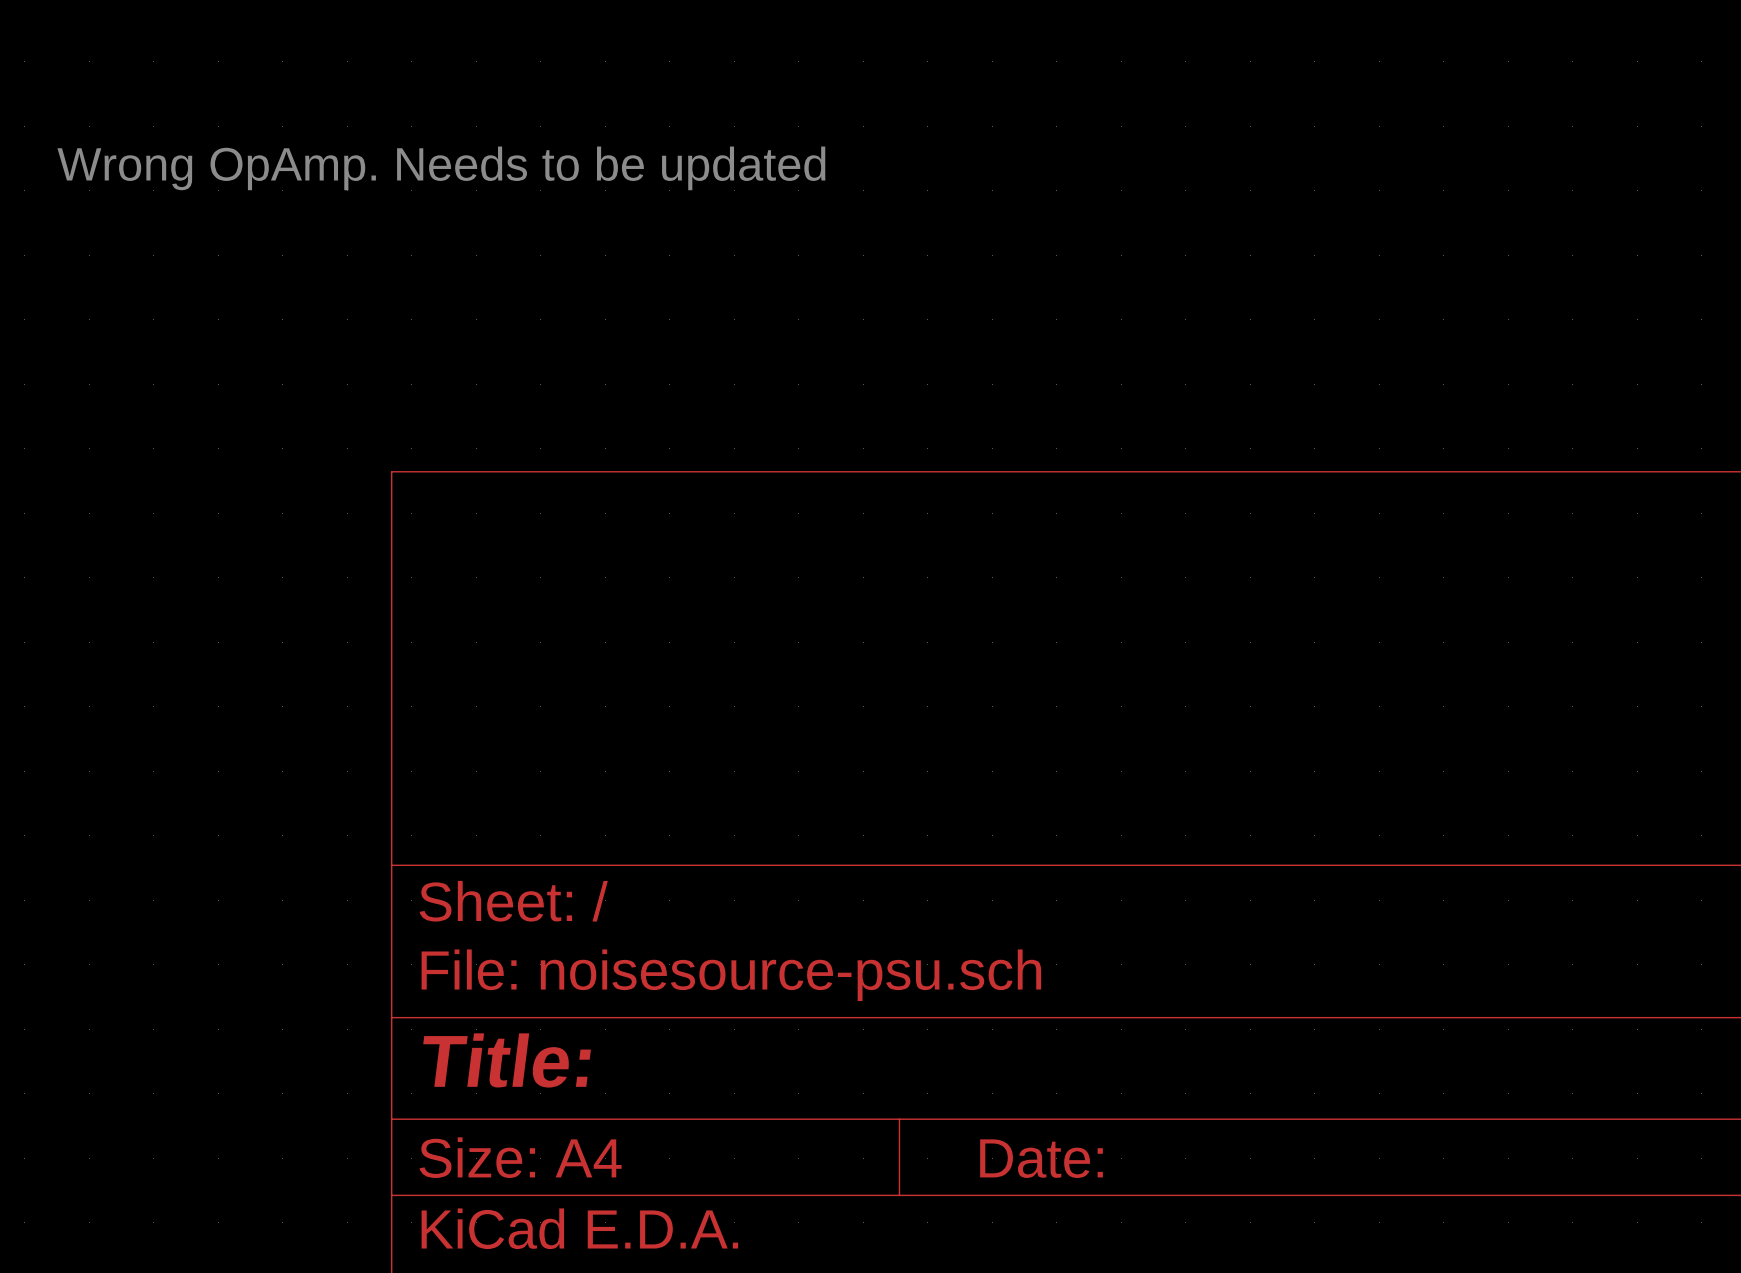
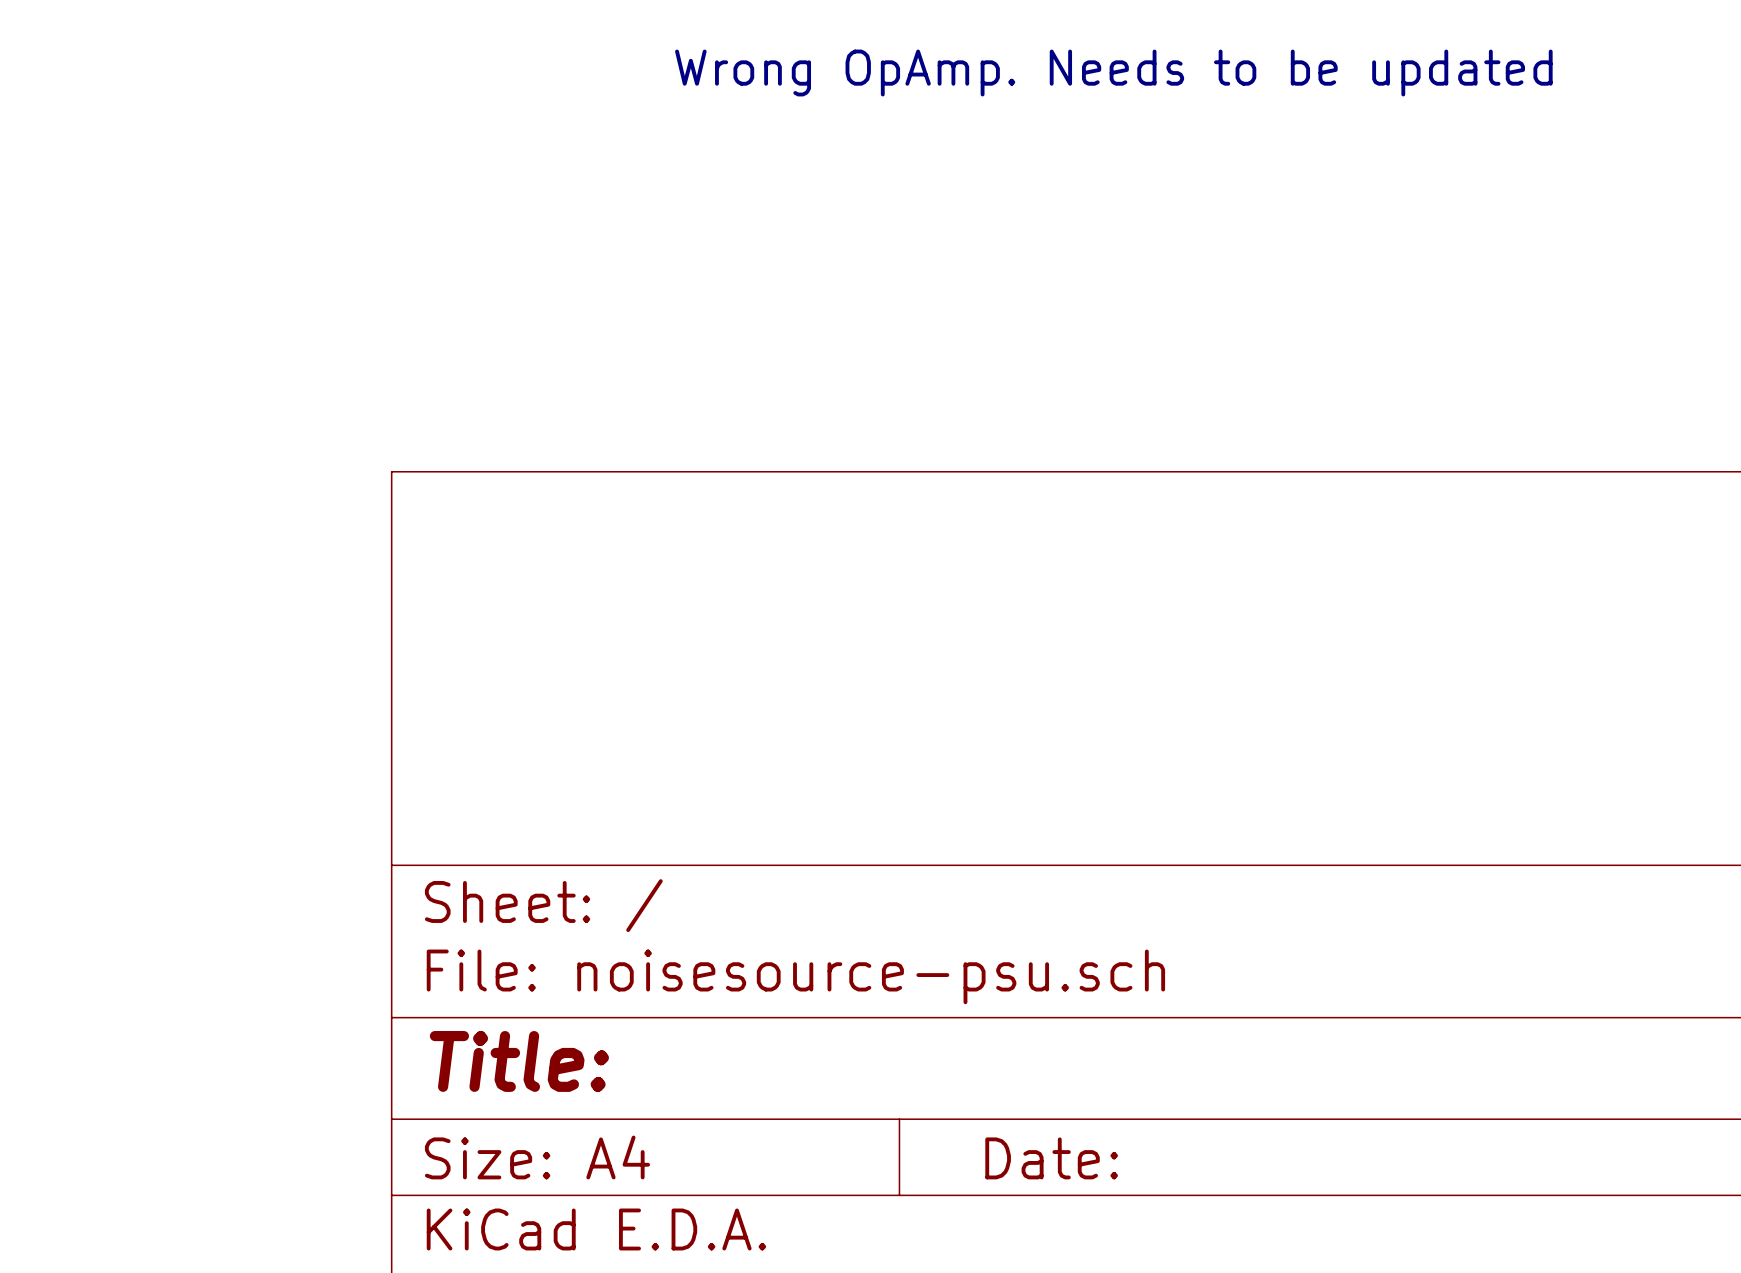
text position: Wrong OpAmp. Needs to be updated (441, 168) -> Wrong OpAmp. Needs to be updated (1113, 73)

